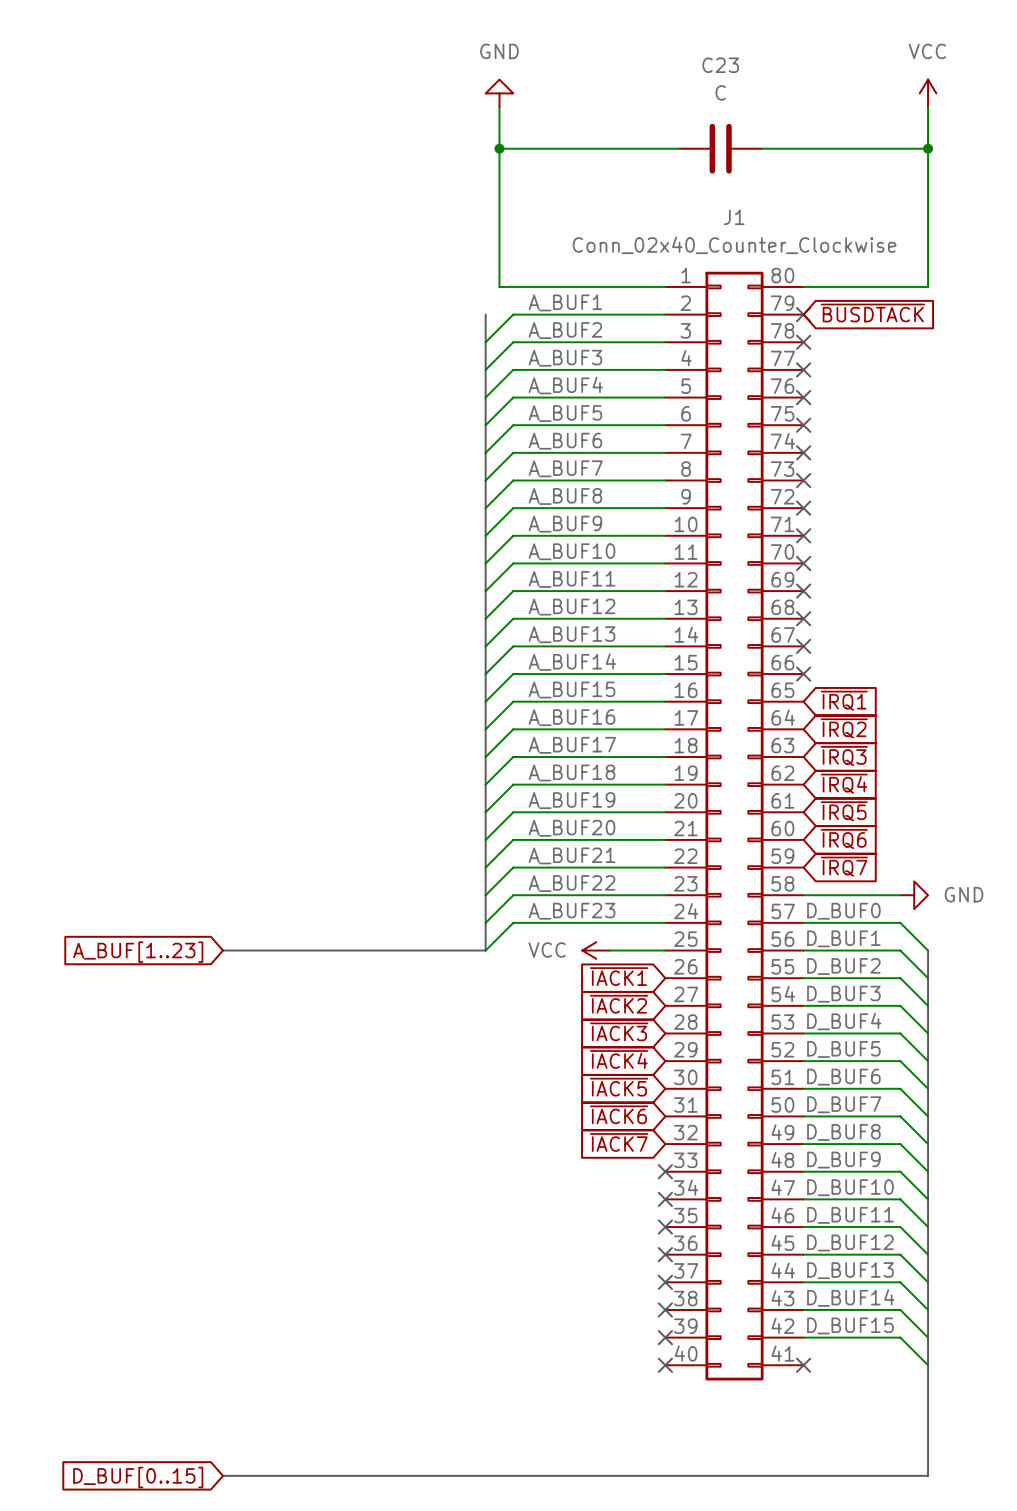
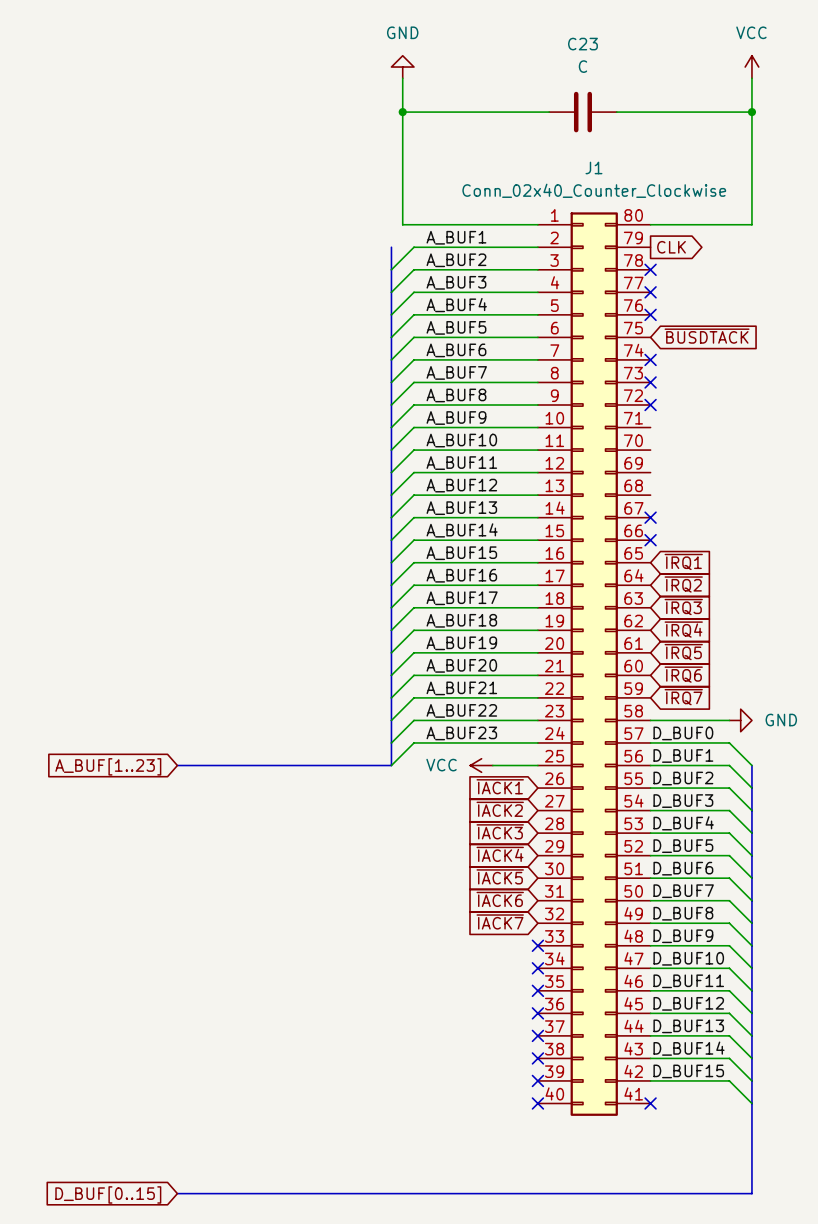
global label shape: input (872, 313) -> output (671, 247)
global label: ~{BUSDTACK} (872, 313) -> CLK (671, 247)
no-connect mark: (803, 314) -> none
global label: none -> ~{BUSDTACK} (707, 336)
no-connect mark: (803, 425) -> none
no-connect mark: (803, 535) -> none
no-connect mark: (803, 563) -> none
no-connect mark: (803, 591) -> none
no-connect mark: (803, 618) -> none

